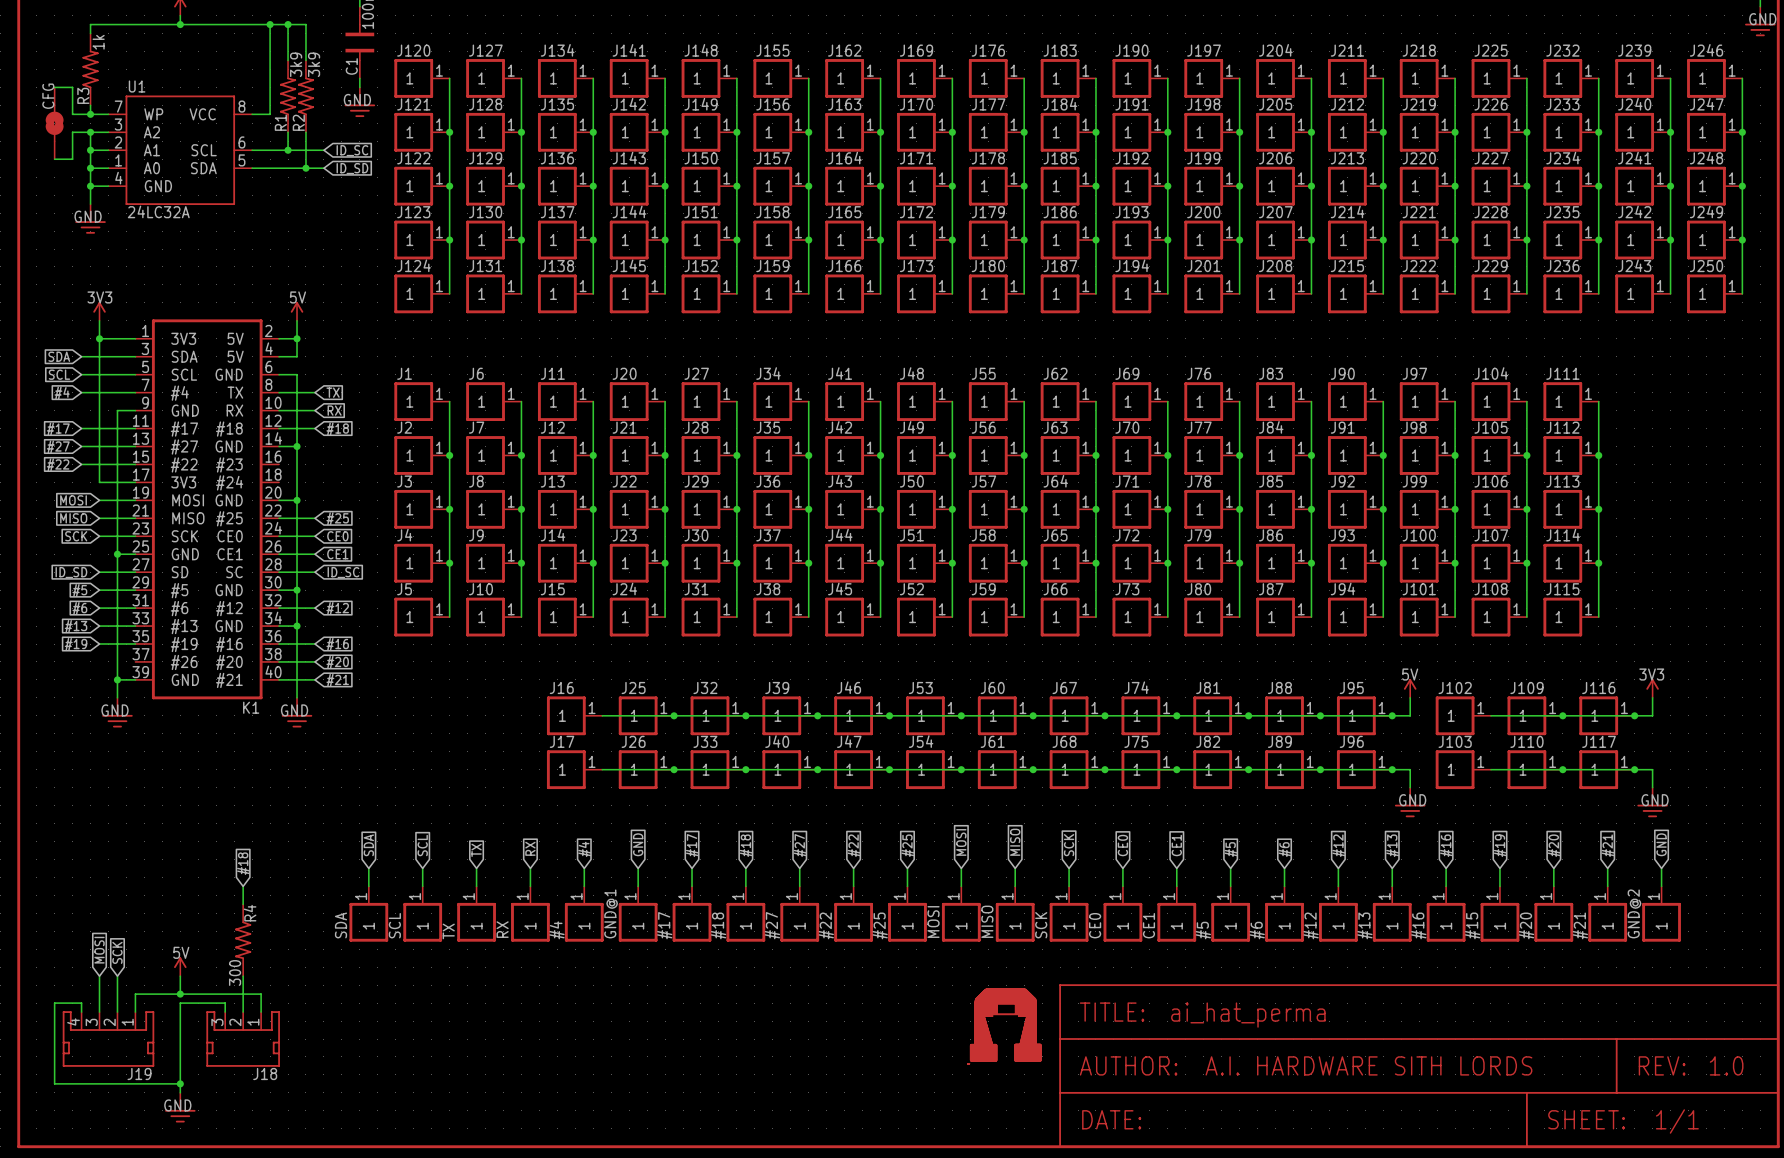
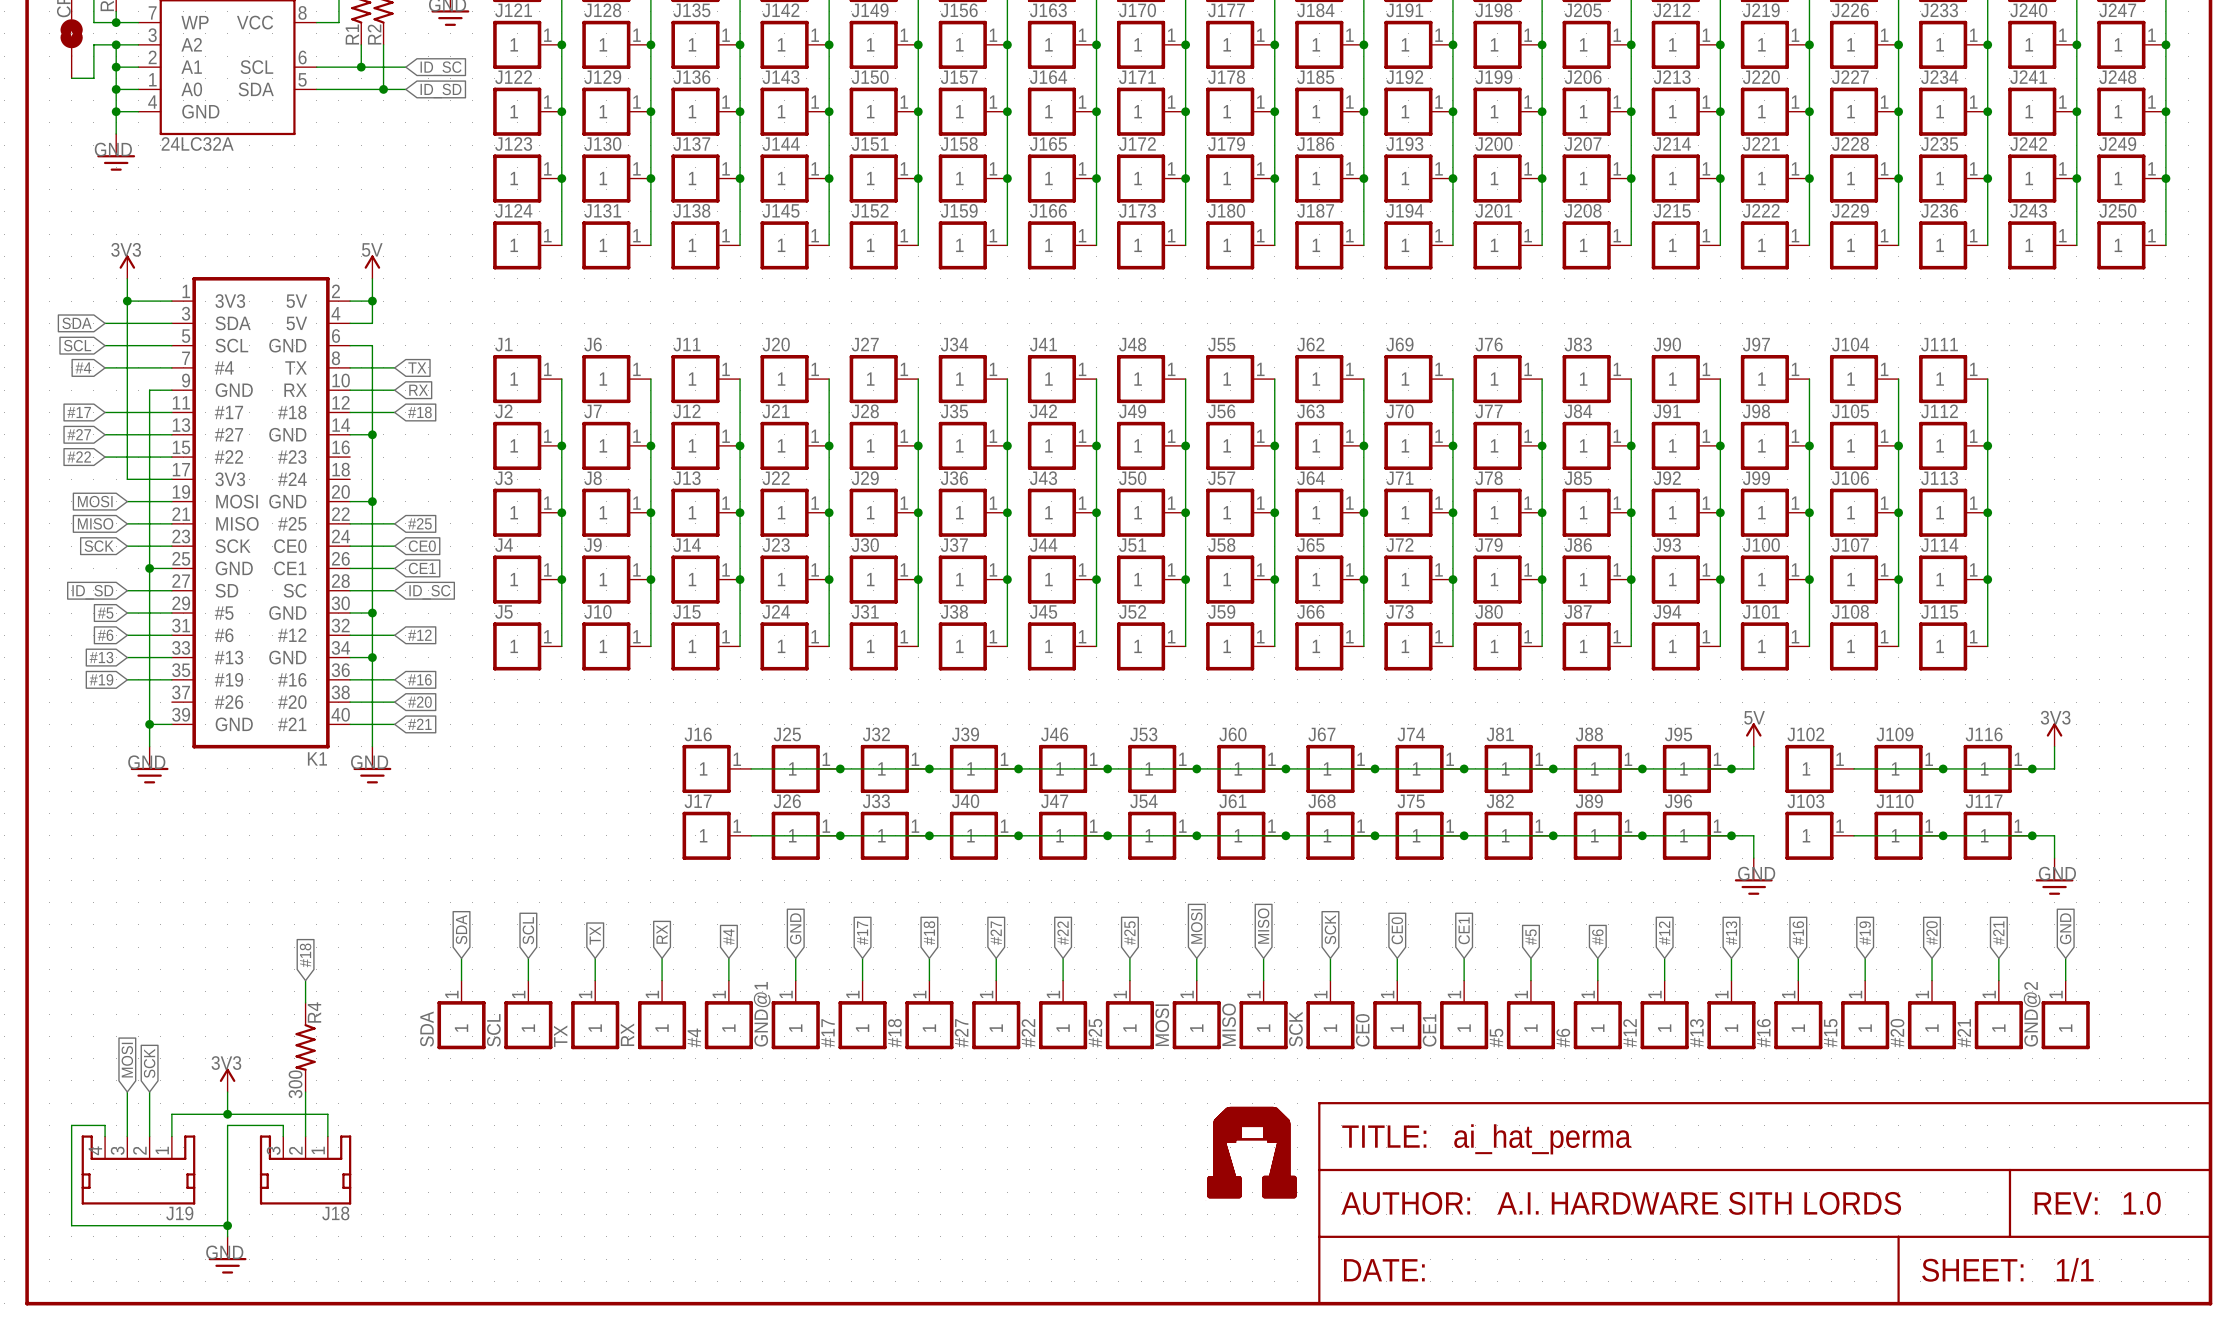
power symbol text: none -> 3V3 (226, 1063)
power symbol text: 5V (181, 952) -> none

